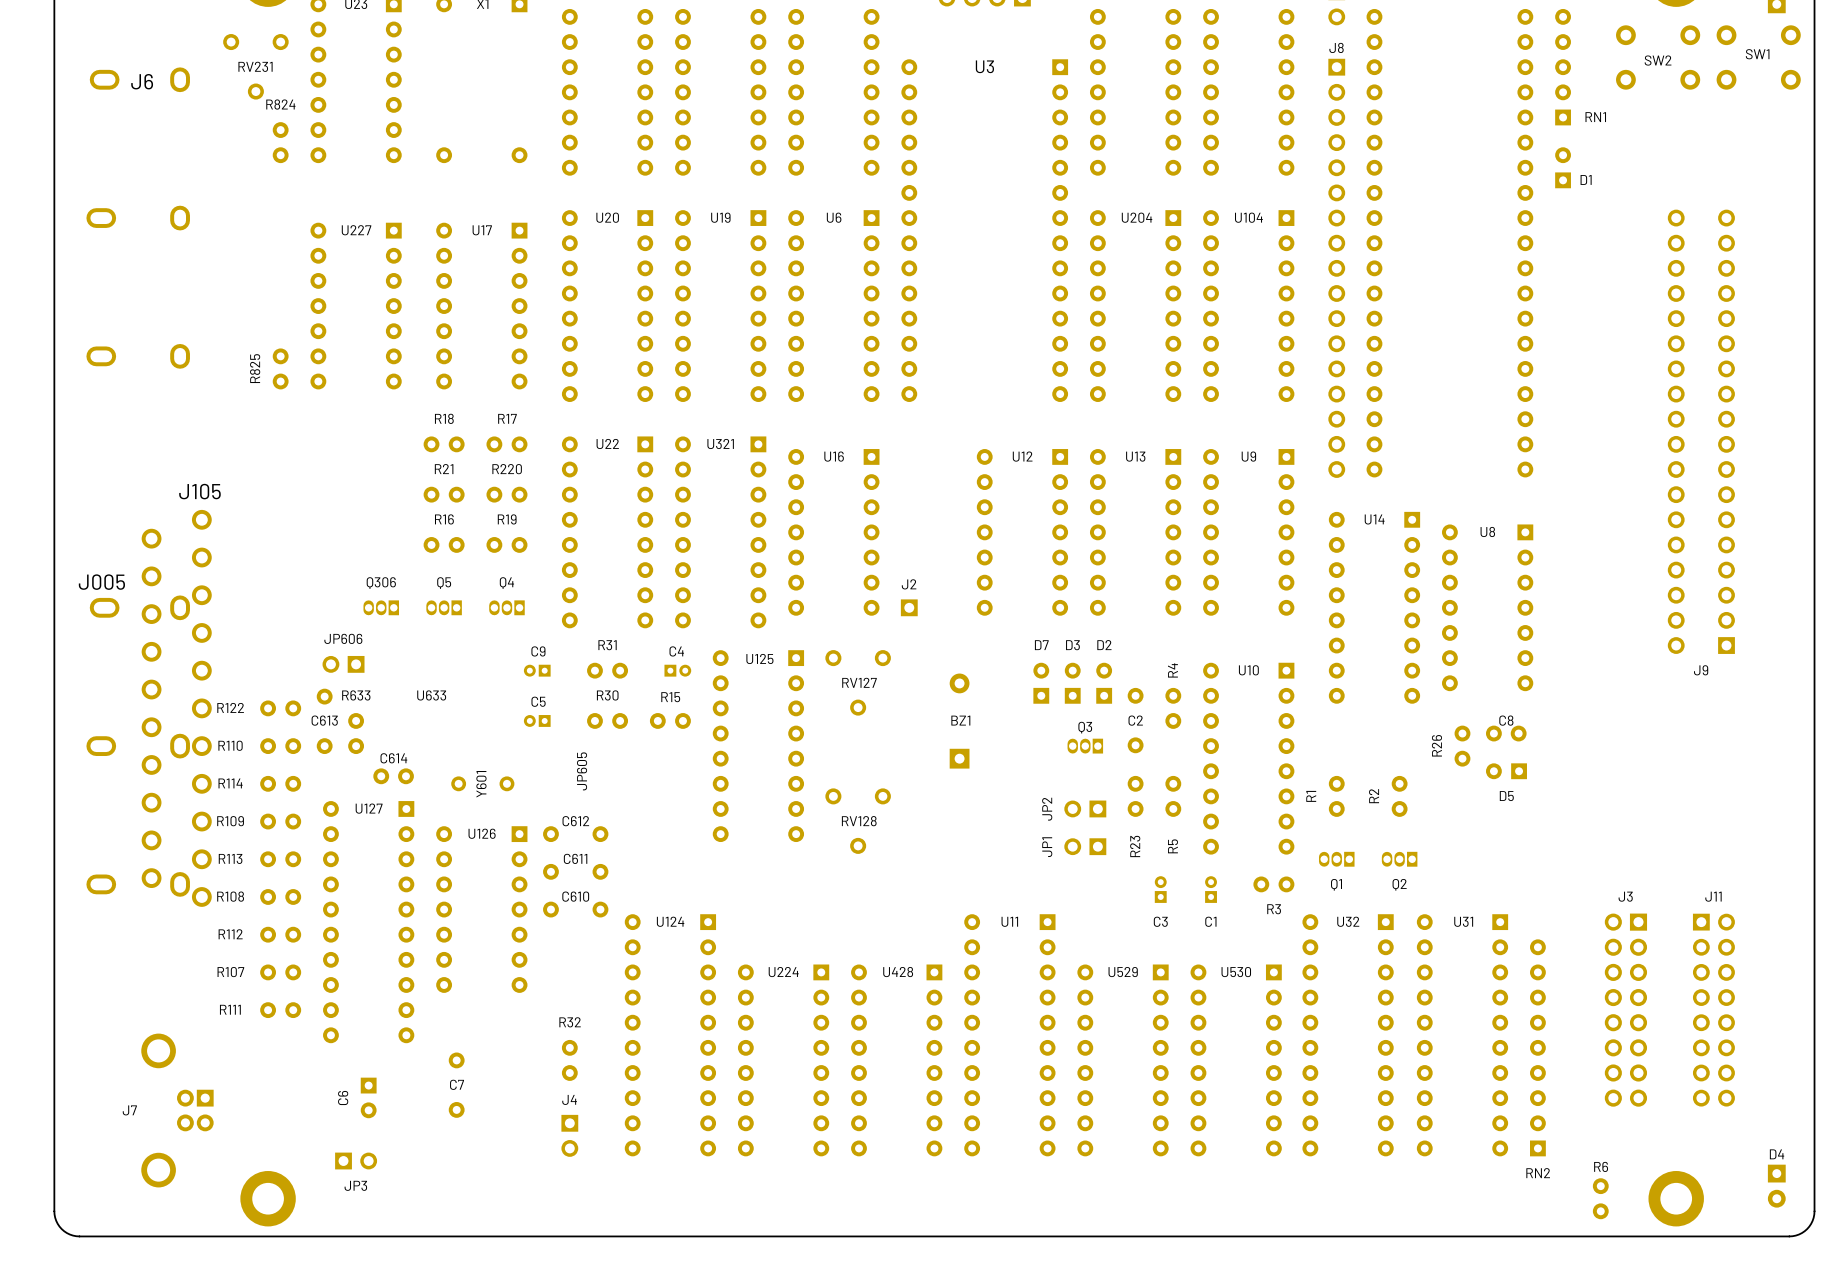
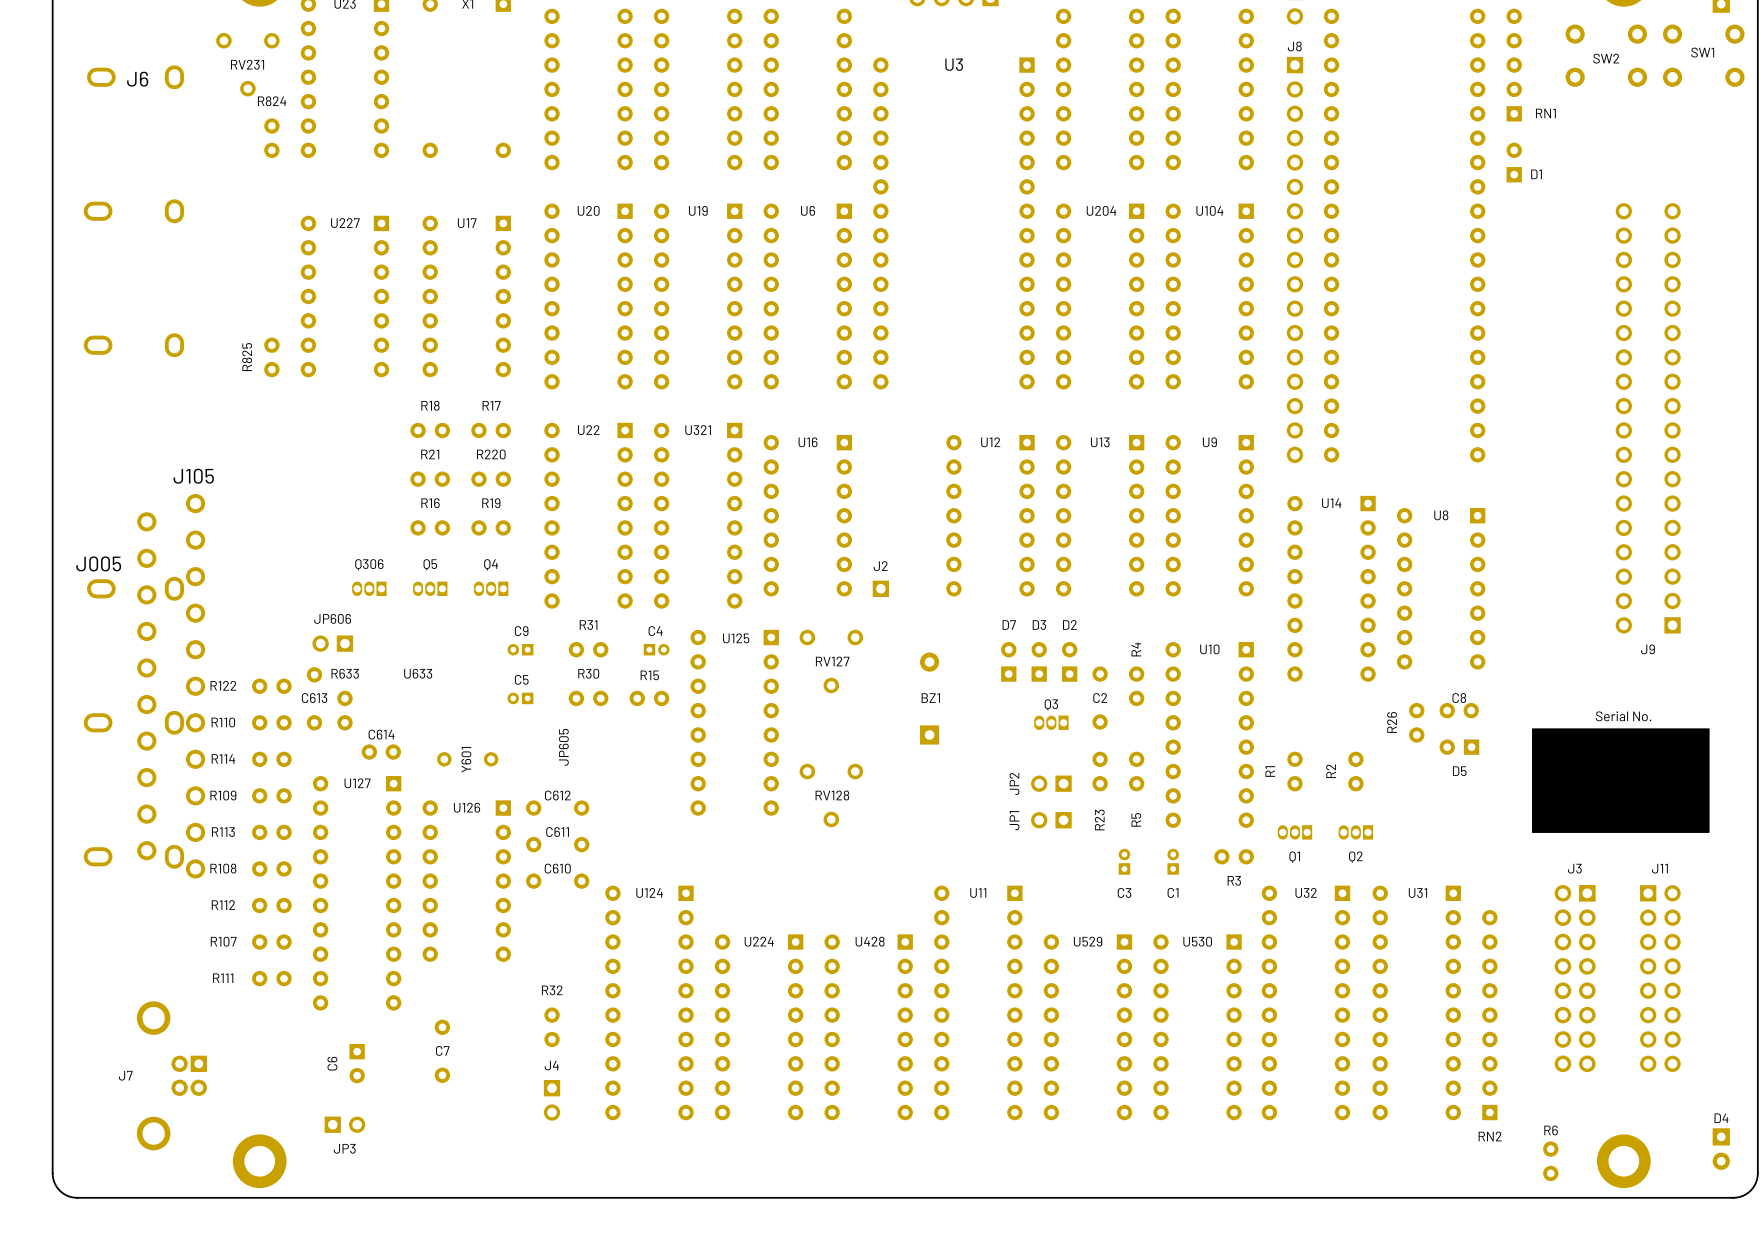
text: none -> Serial No. (1623, 716)
drawing: none -> [1532, 728, 1710, 833]

